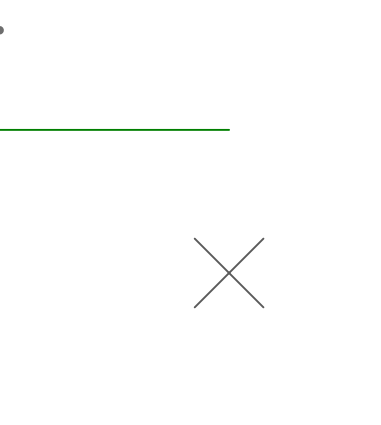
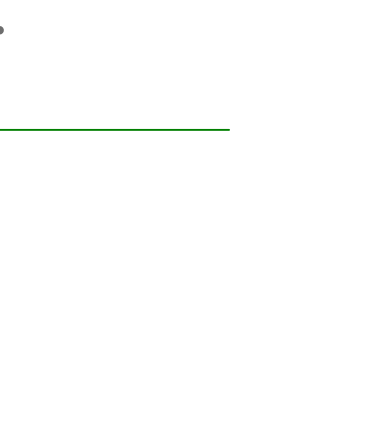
no-connect mark: (229, 272) -> none

